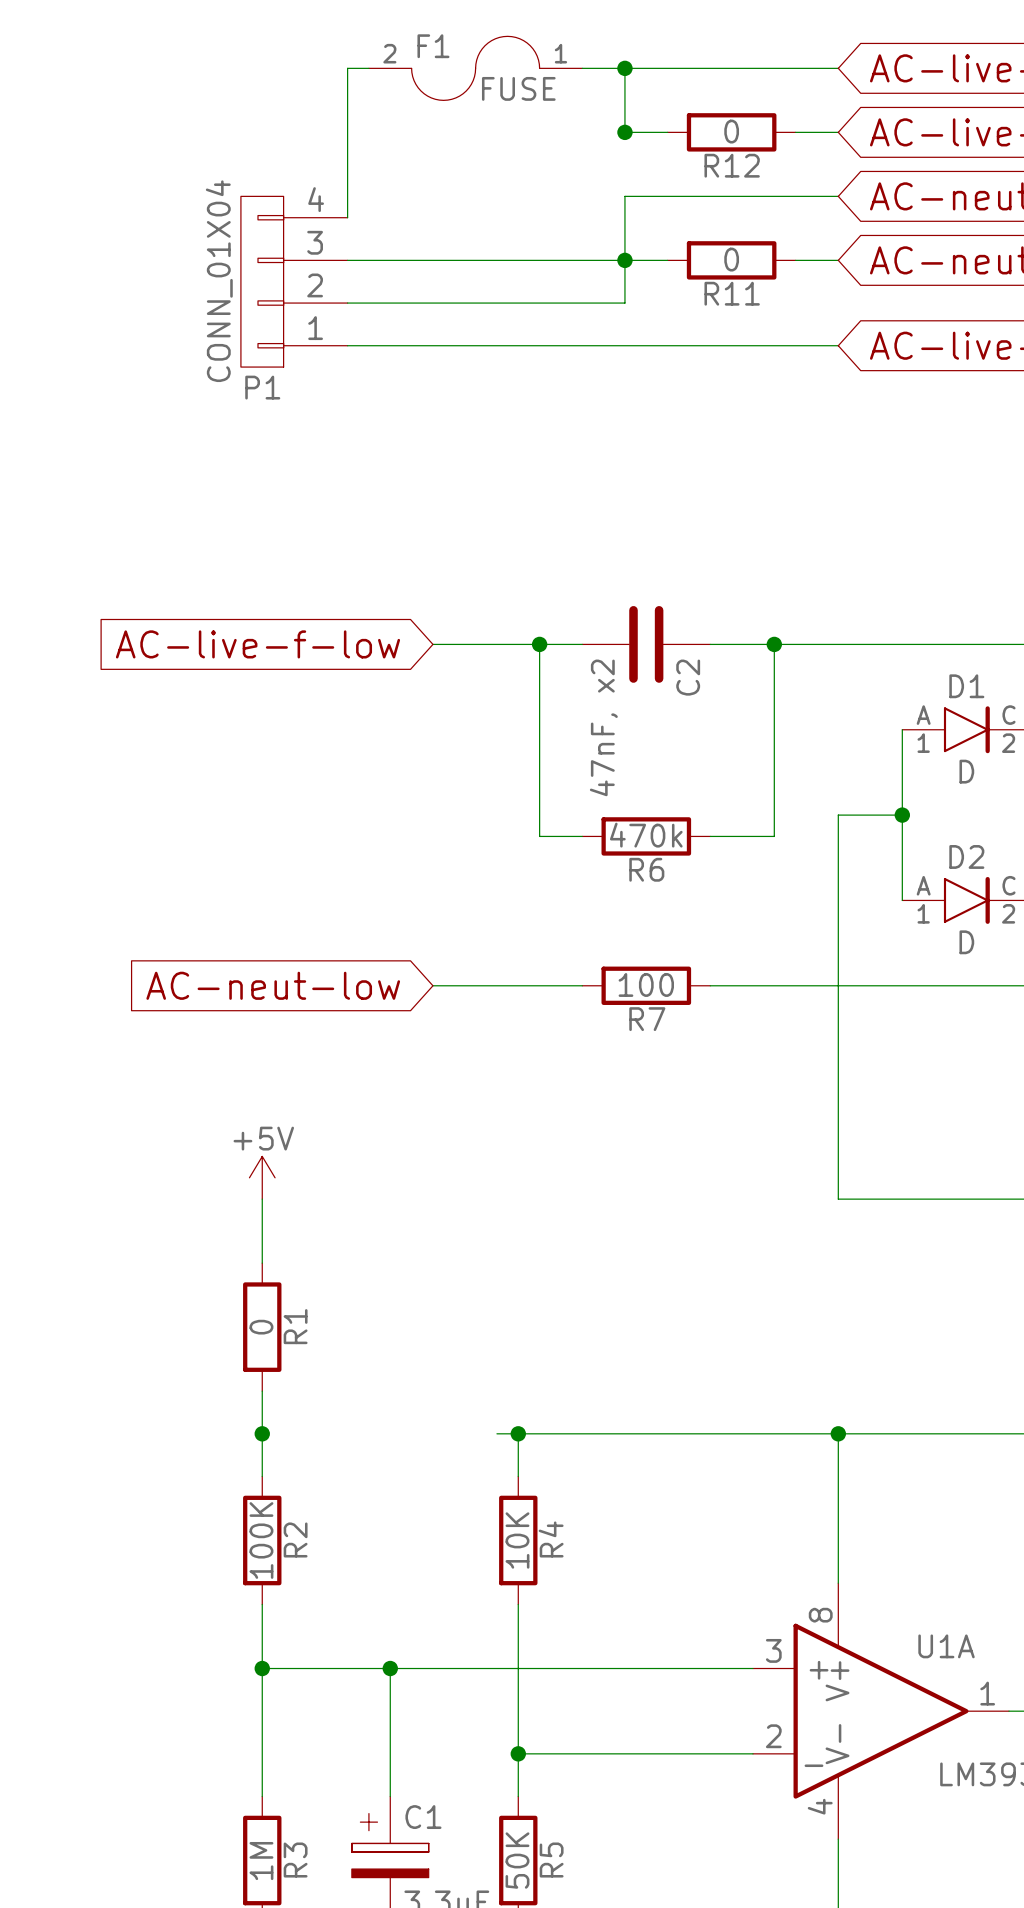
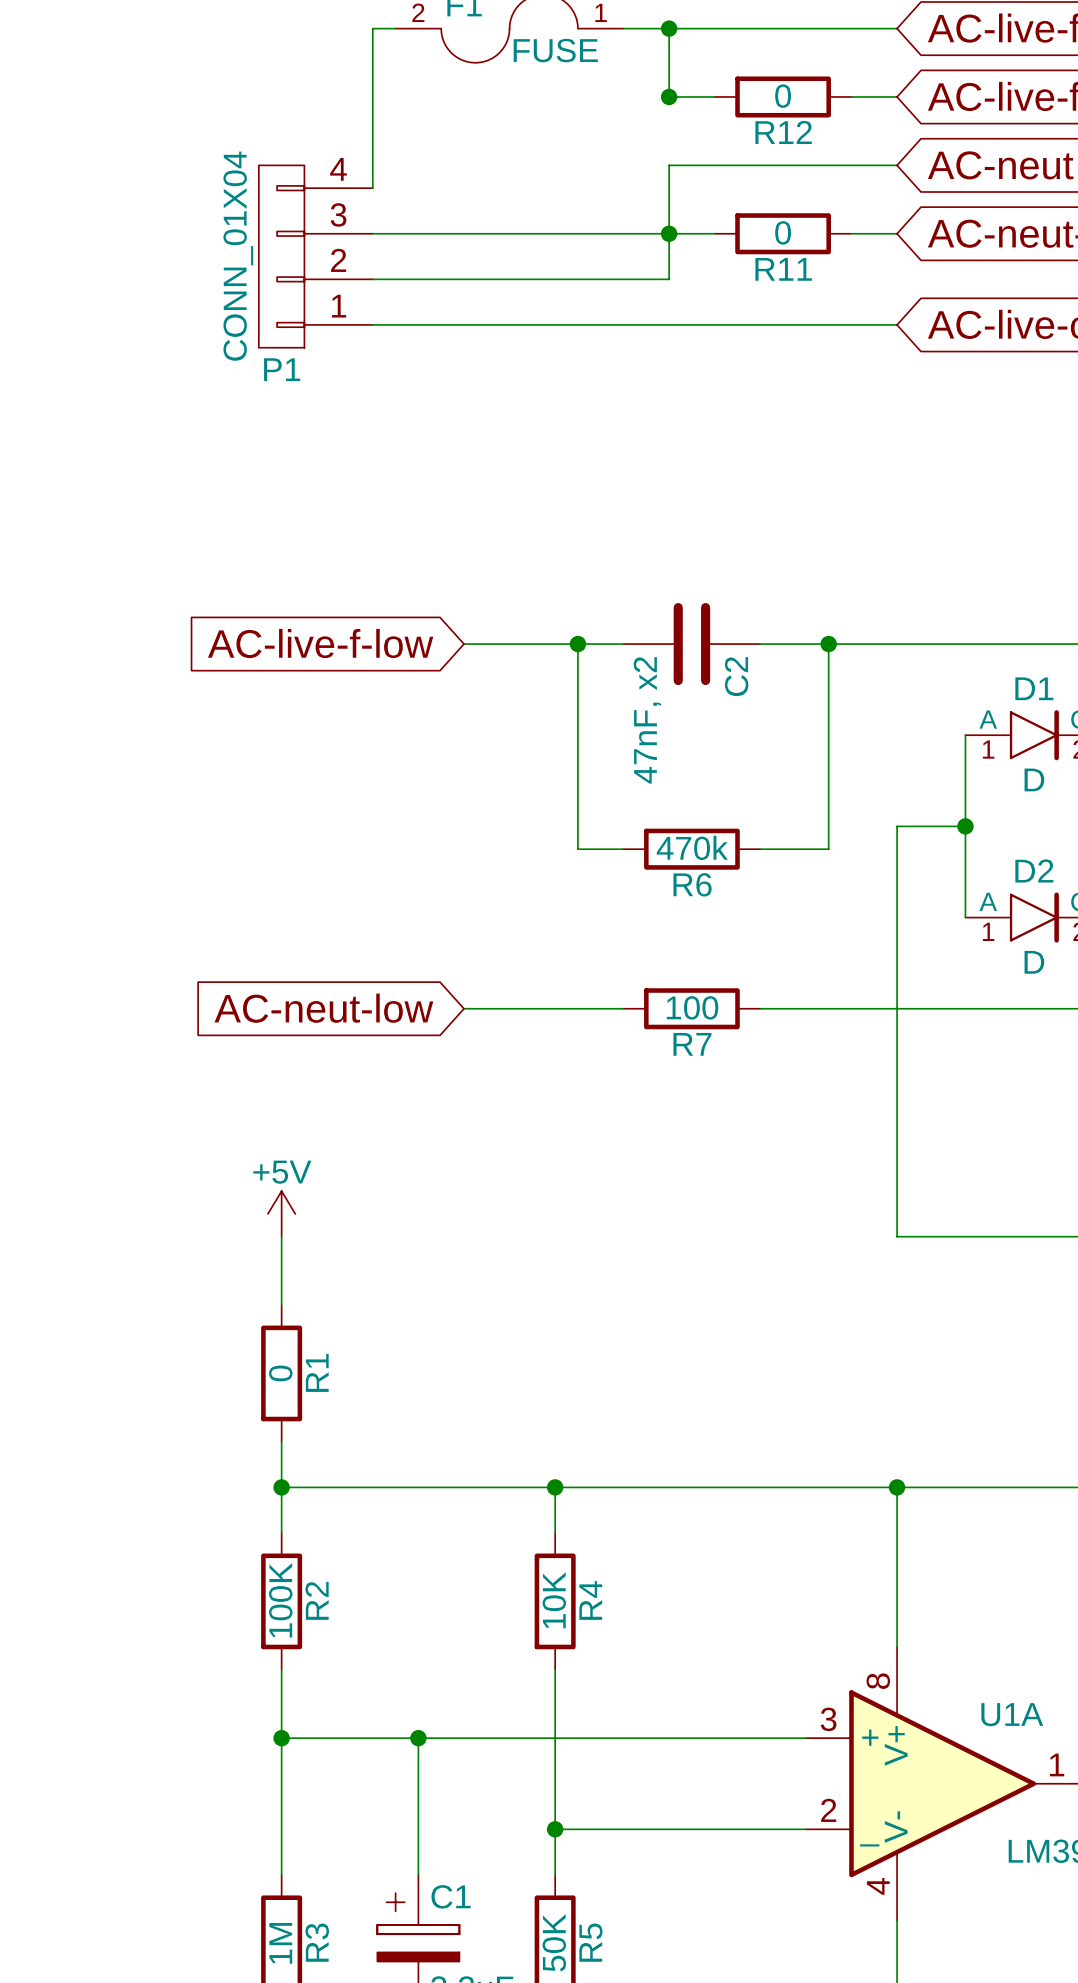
wire: none -> (281, 1487) (532, 1487)

